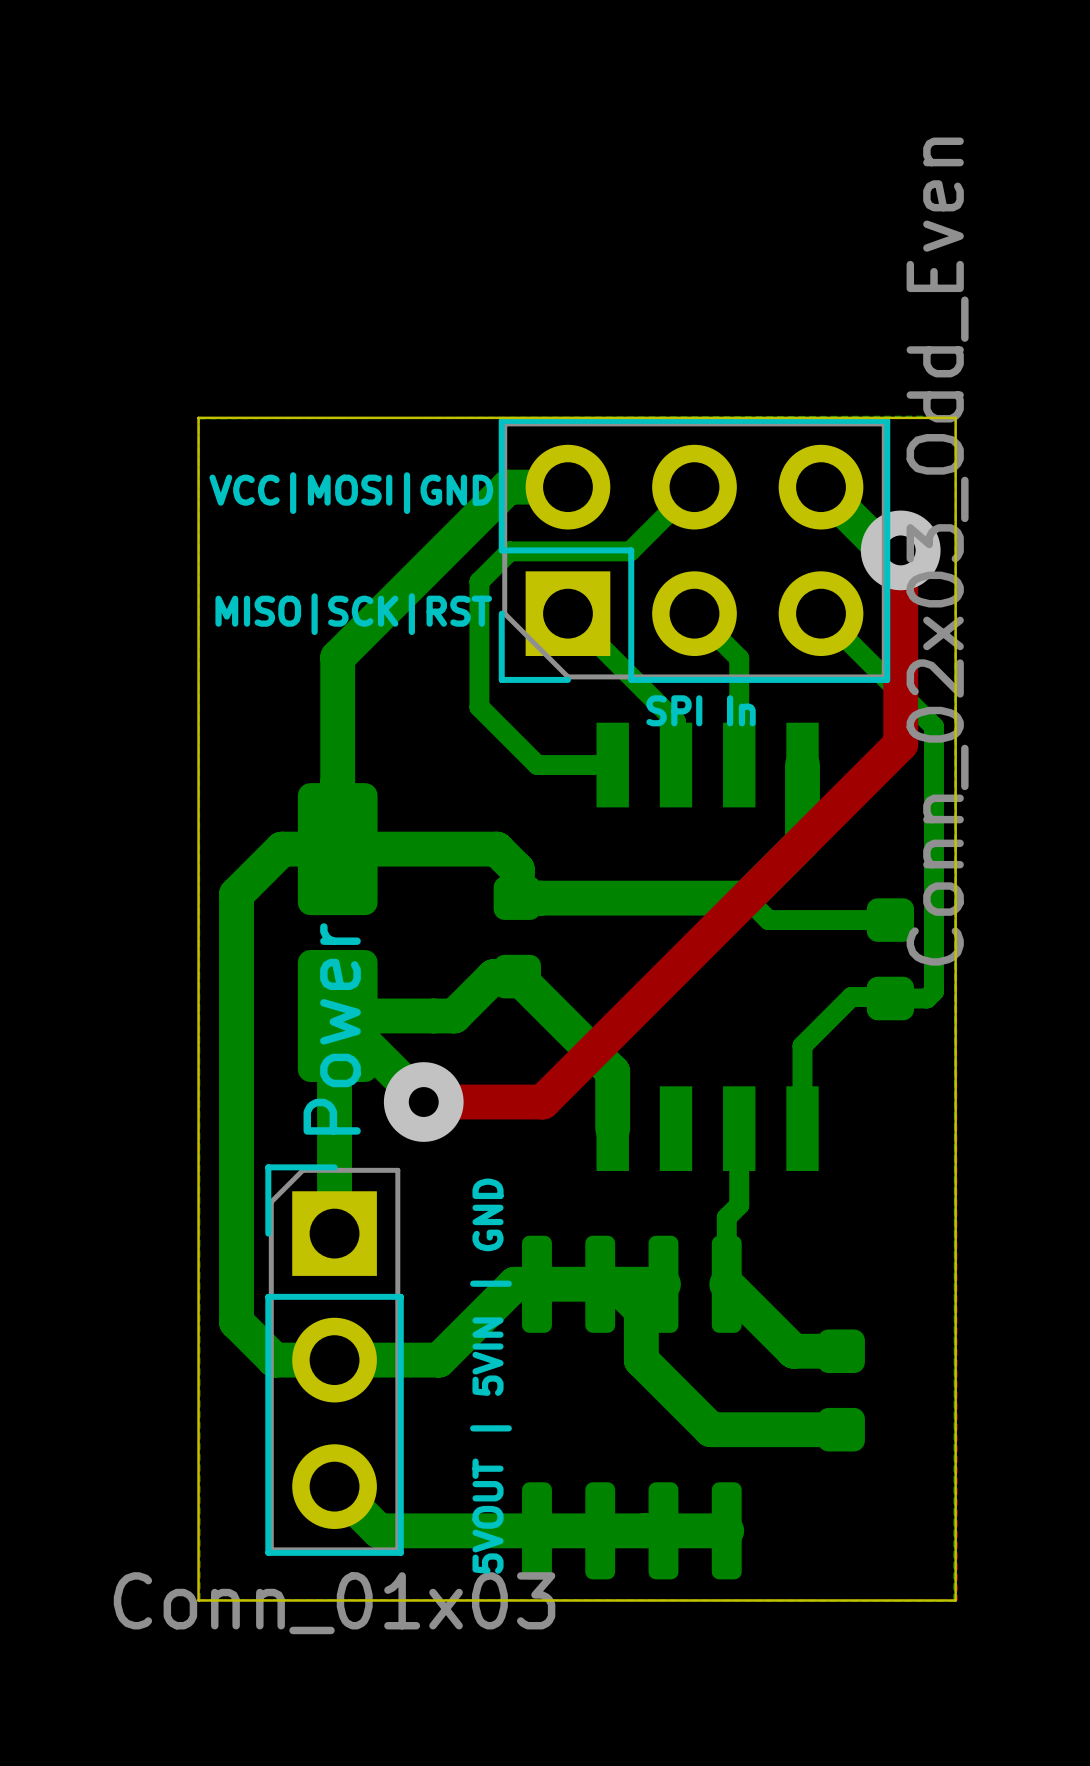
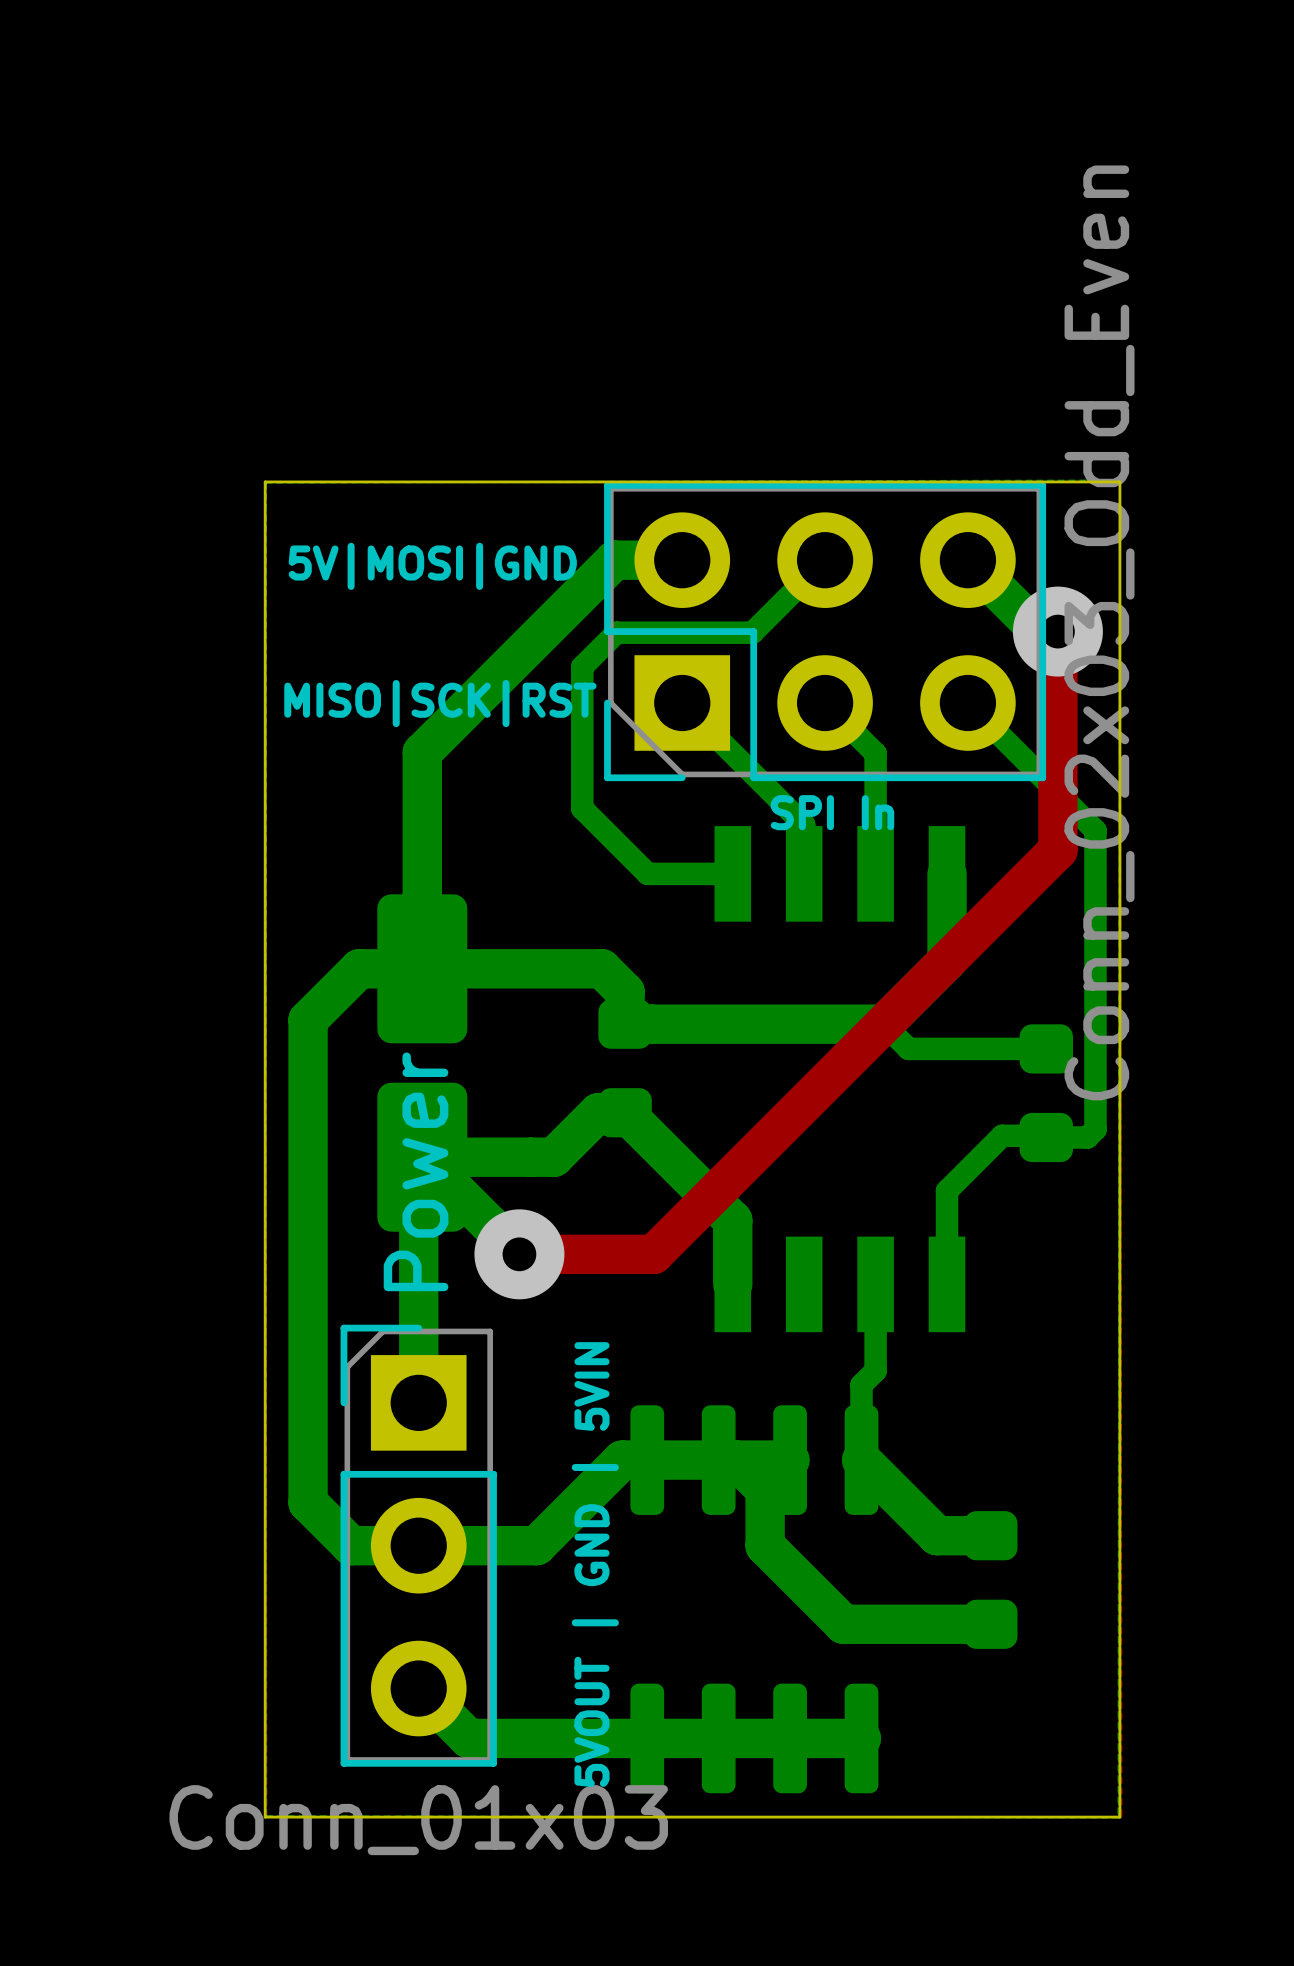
text: VCC|MOSI|GND (351, 493) -> 5V|MOSI|GND (432, 566)
text: 5VOUT | 5VIN | GND (490, 1376) -> 5VOUT | GND | 5VIN (595, 1564)

